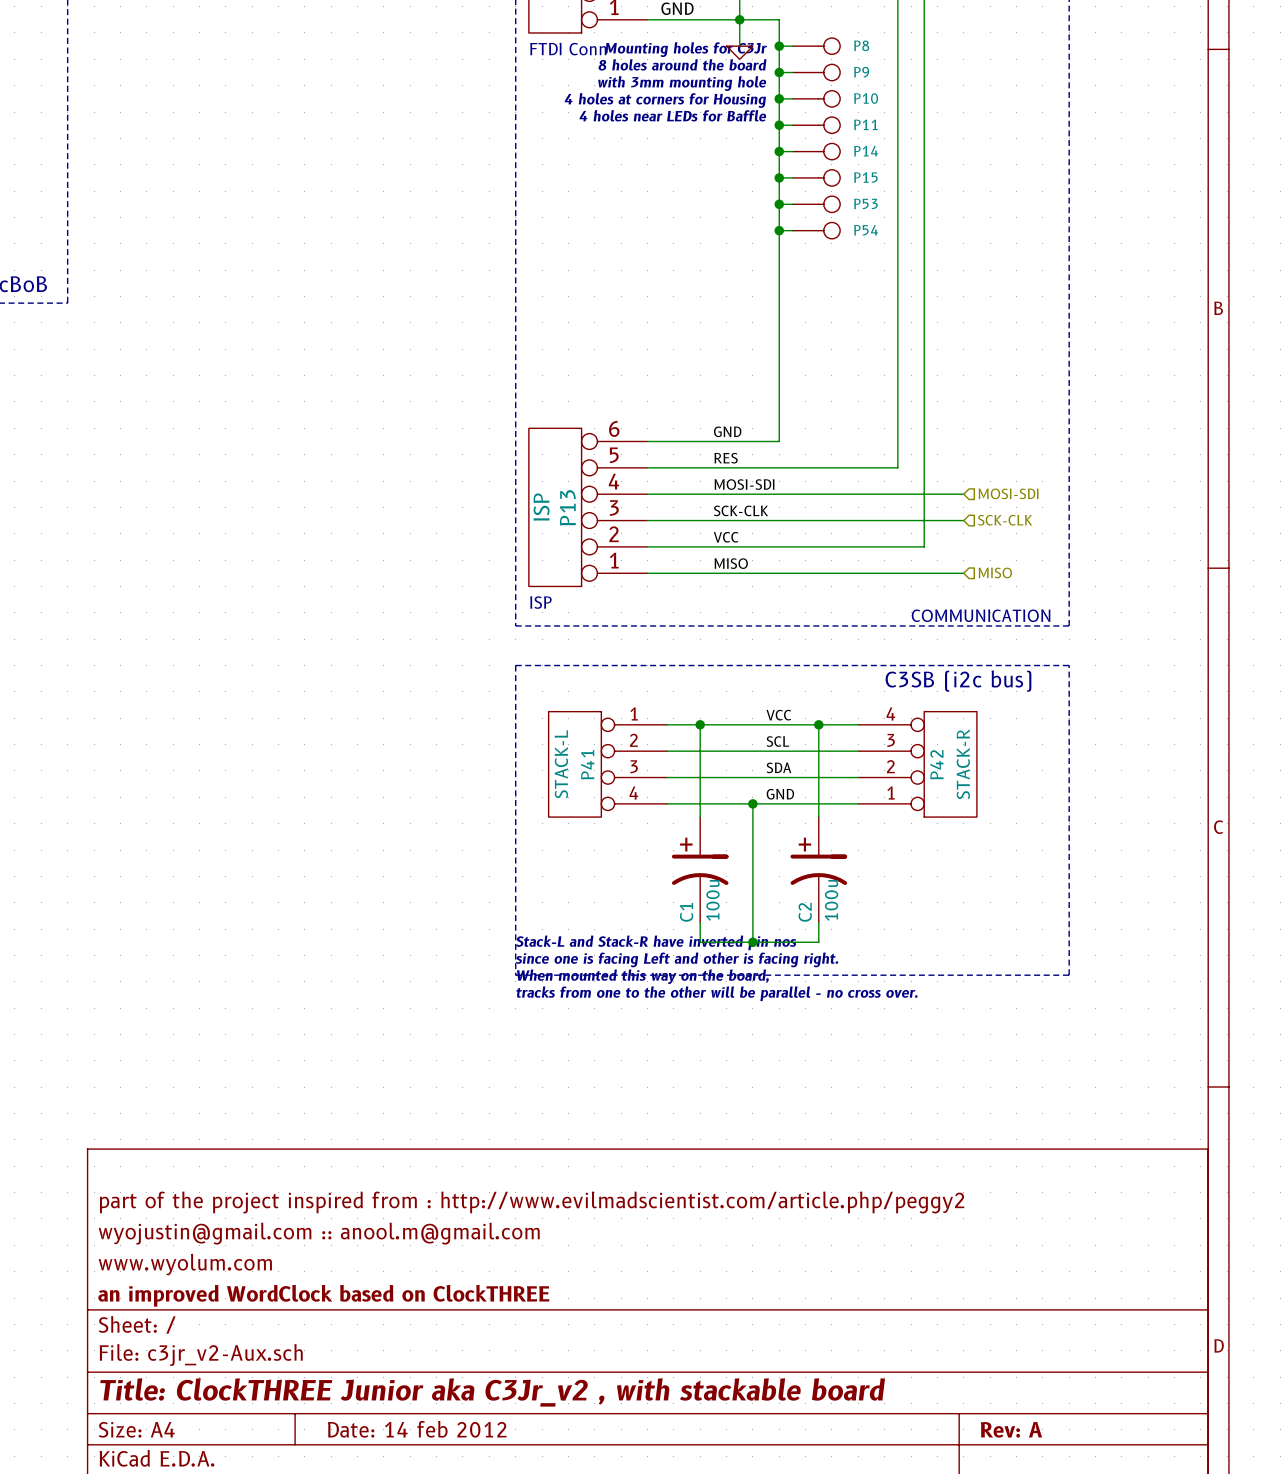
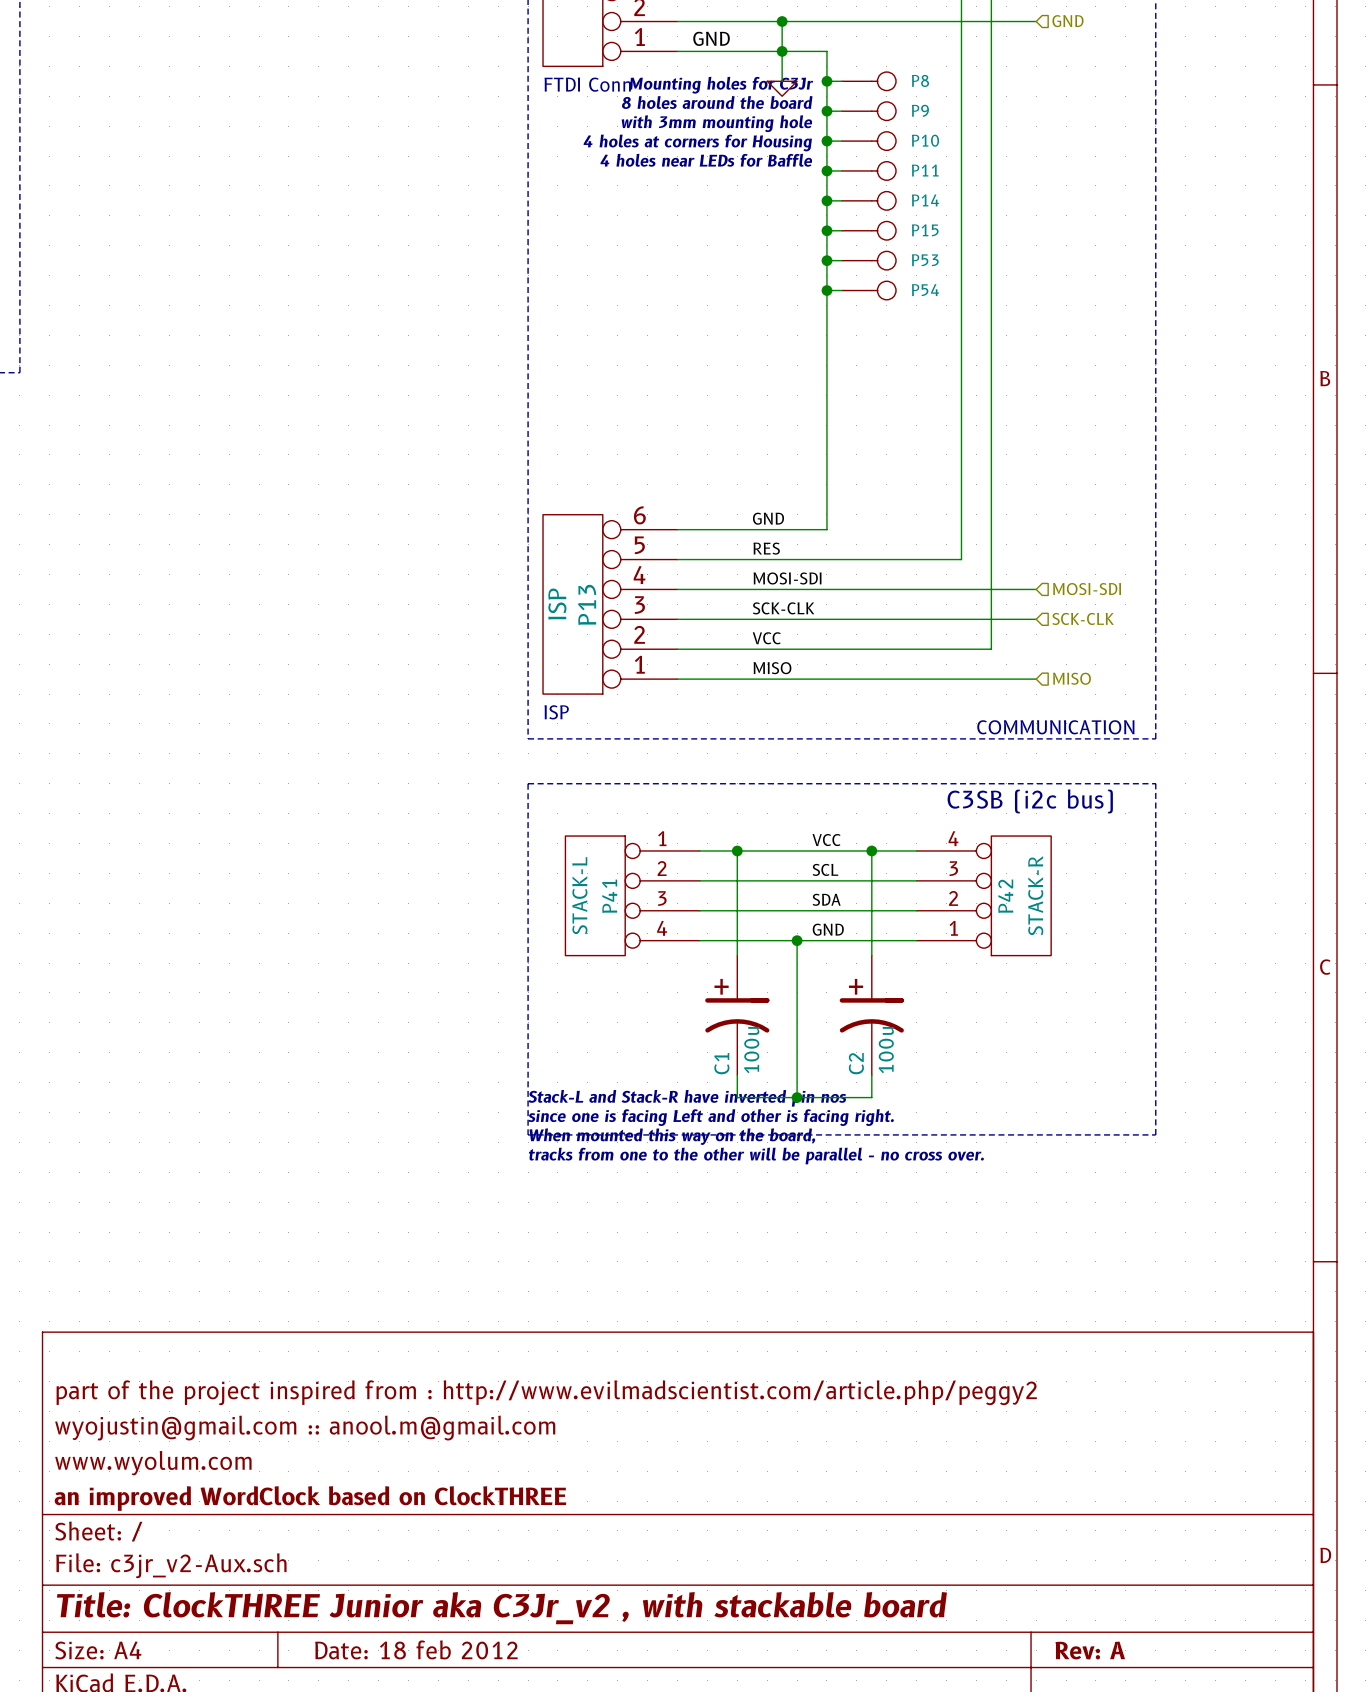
title block: Date: 14 feb 2012 (417, 1429) -> Date: 18 feb 2012 (416, 1649)

